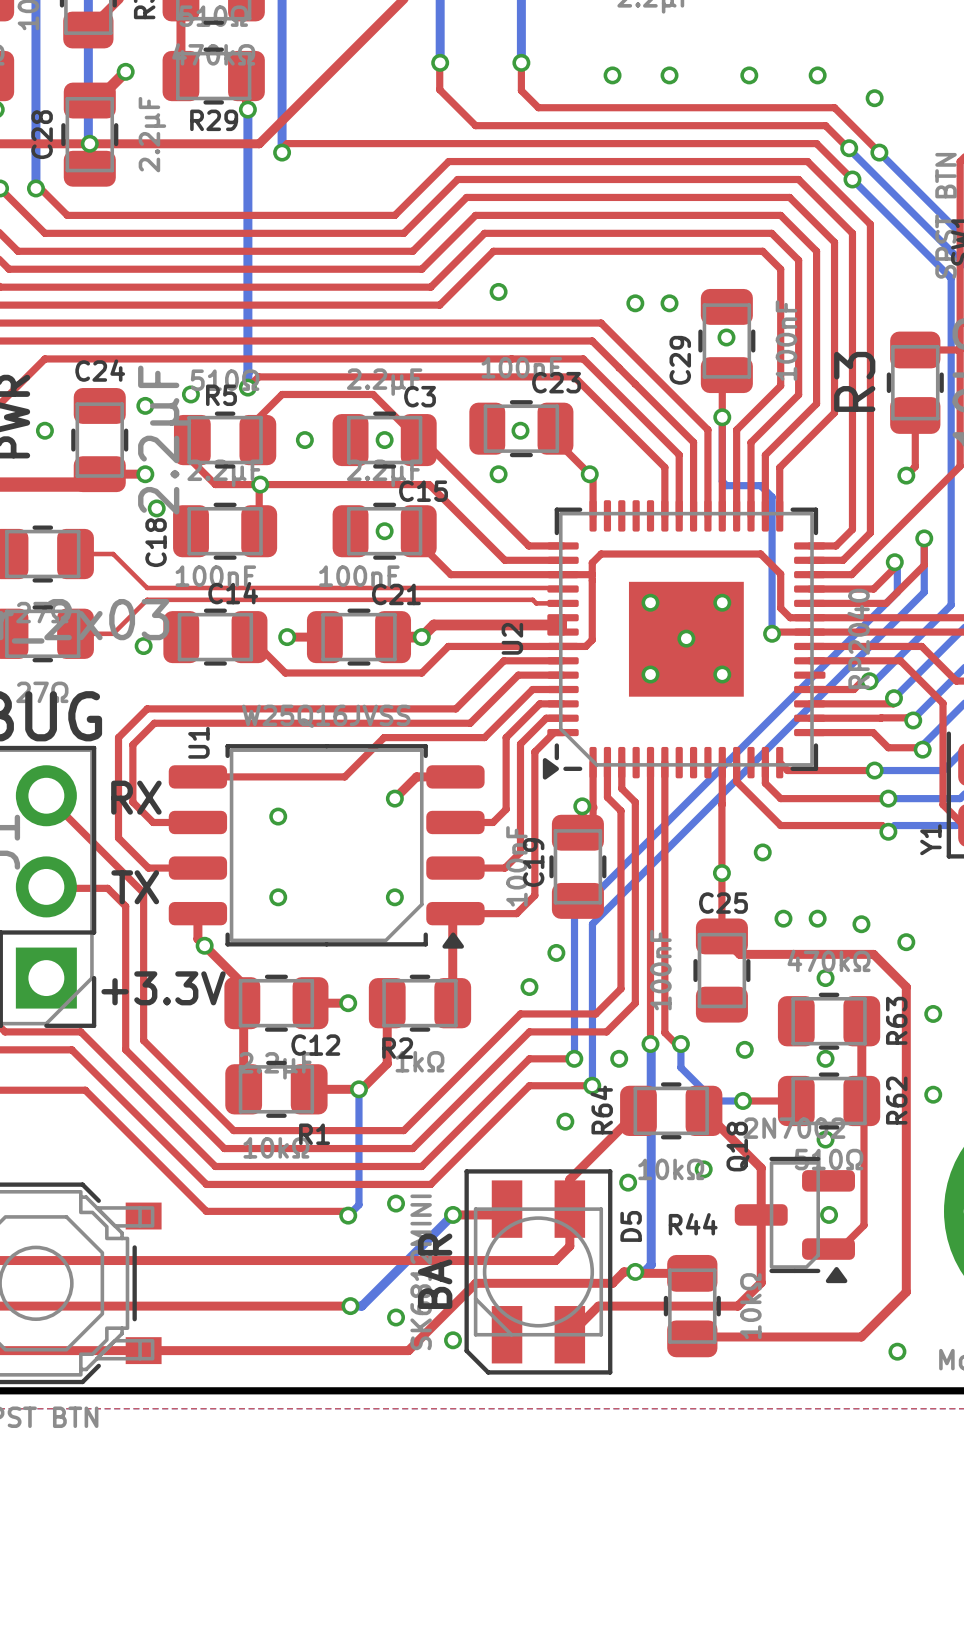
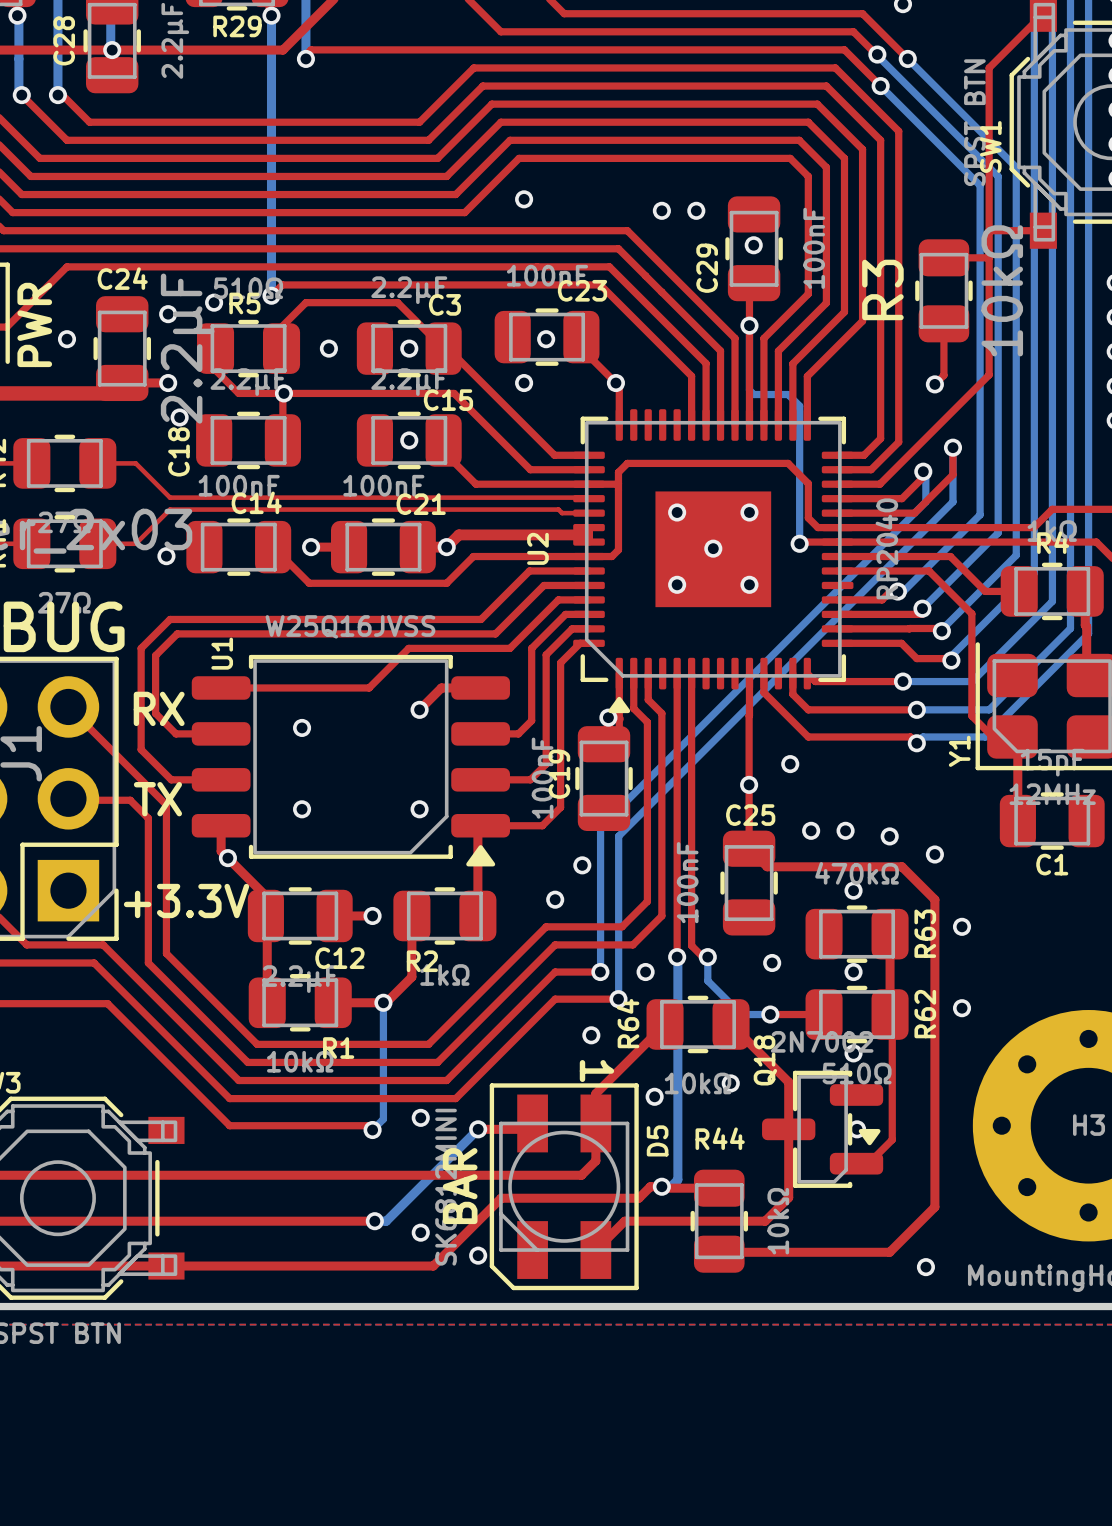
U2 footprint: [542, 500, 826, 780] -> [573, 409, 854, 714]
U1 footprint: [168, 744, 485, 949] -> [191, 654, 510, 867]
Q18 footprint: [734, 1156, 855, 1284] -> [762, 1070, 884, 1188]
D5 text: none -> 1 (596, 1071)

